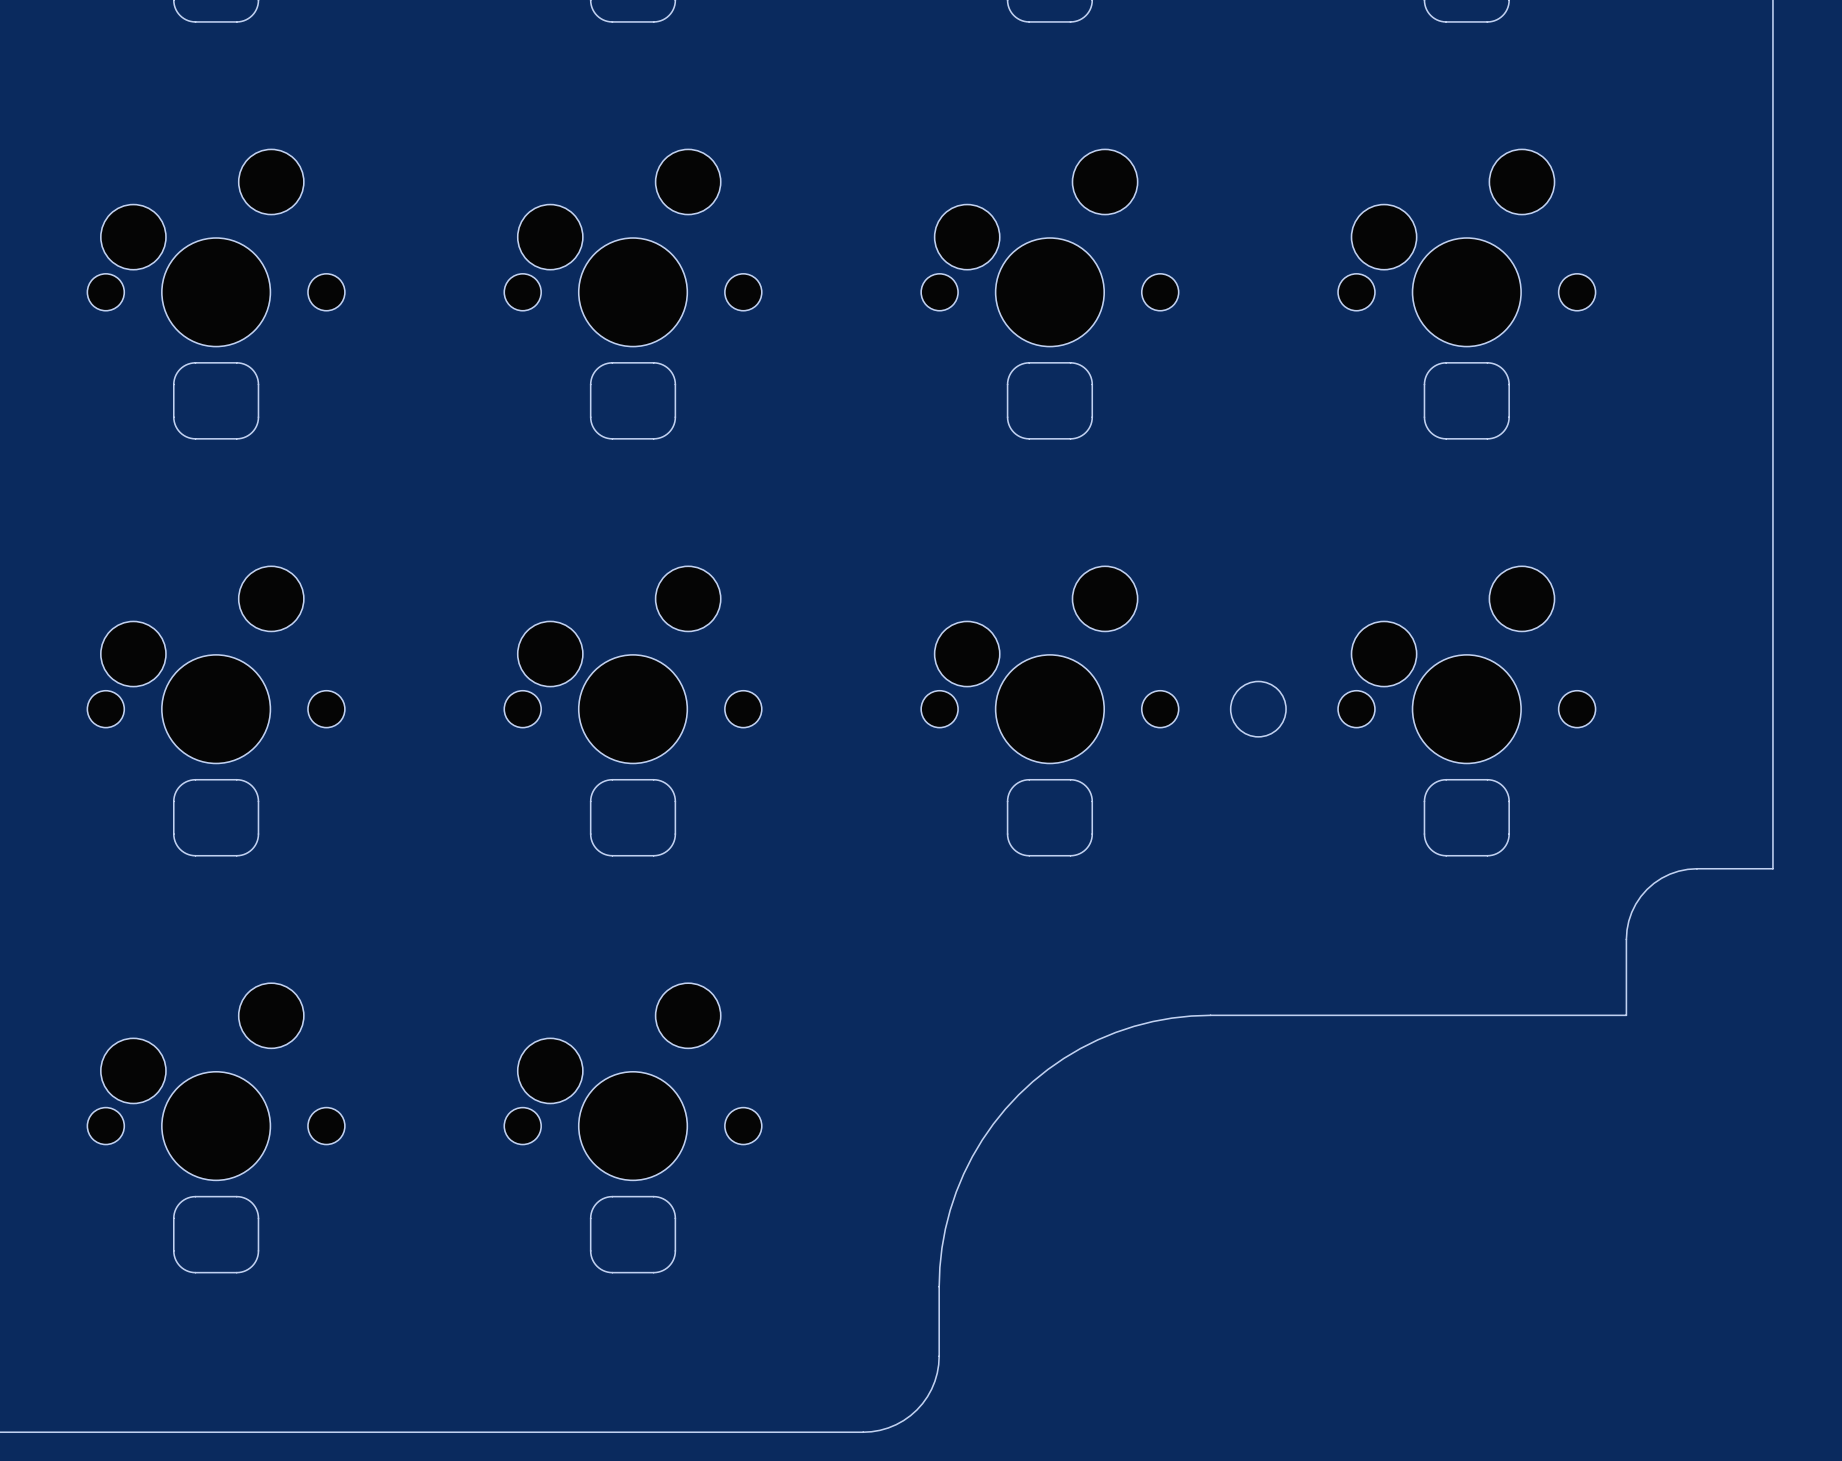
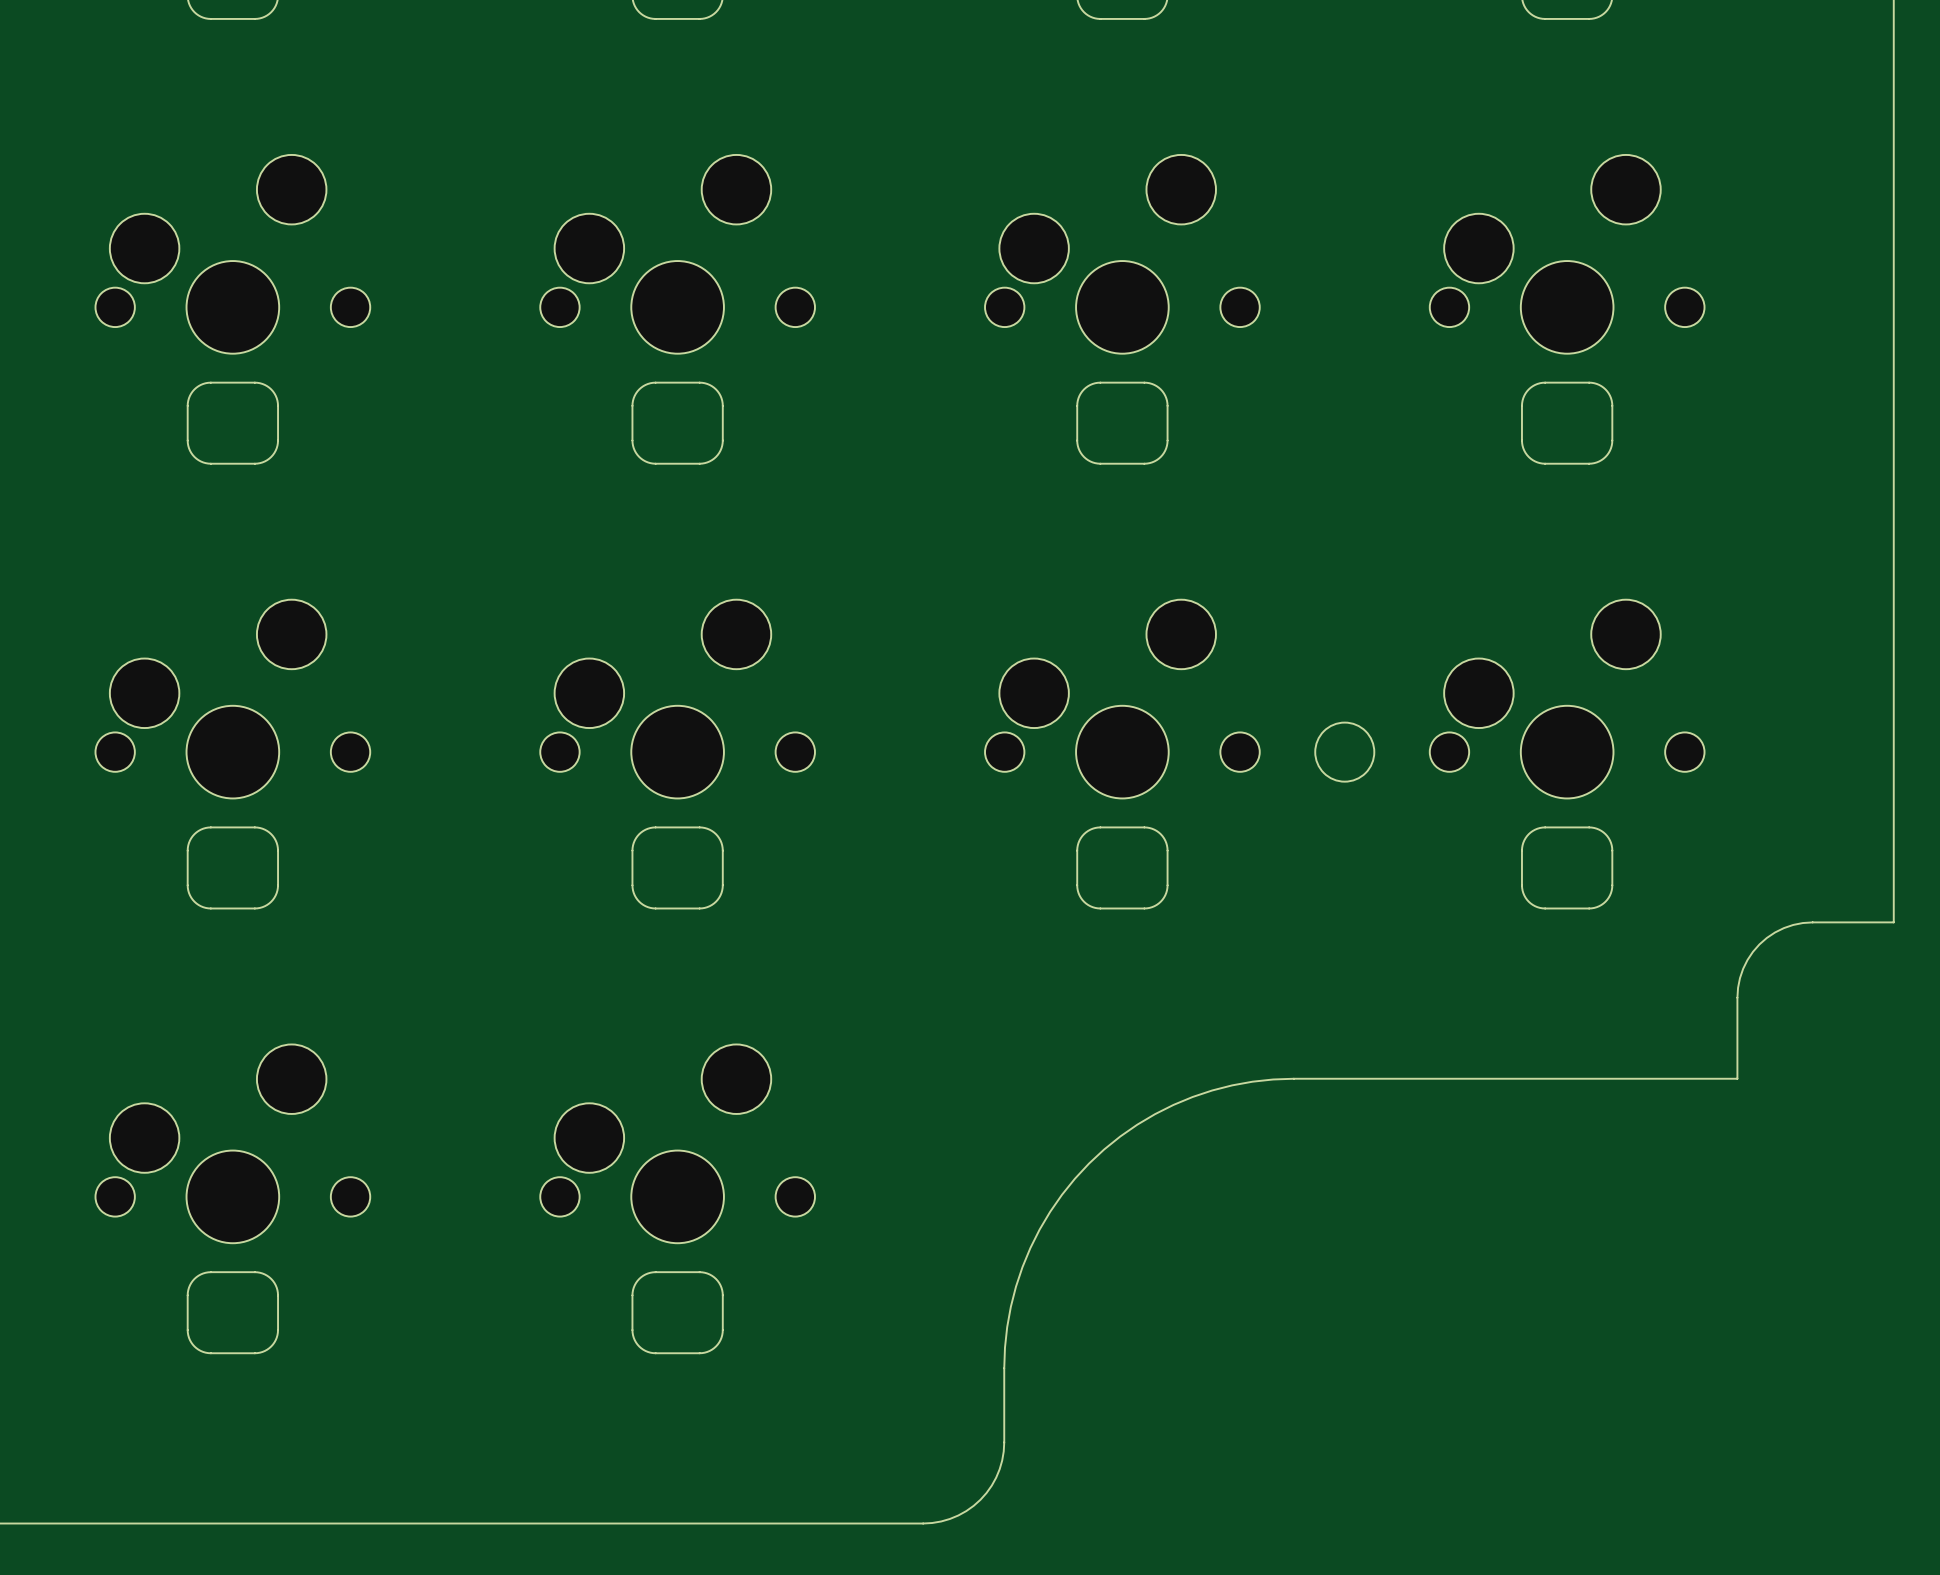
part footprint: [87, 149, 345, 347] -> [95, 154, 371, 354]
part footprint: [504, 149, 762, 347] -> [540, 154, 815, 354]
part footprint: [921, 149, 1179, 347] -> [985, 154, 1260, 354]
part footprint: [1338, 149, 1596, 347] -> [1429, 154, 1705, 354]
part footprint: [87, 566, 345, 764] -> [95, 599, 371, 799]
part footprint: [504, 566, 762, 764] -> [540, 599, 815, 799]
part footprint: [921, 566, 1179, 764] -> [985, 599, 1260, 799]
part footprint: [1338, 566, 1596, 764] -> [1429, 599, 1705, 799]
part footprint: [87, 983, 345, 1181] -> [95, 1044, 371, 1244]
part footprint: [504, 983, 762, 1181] -> [540, 1044, 815, 1244]

